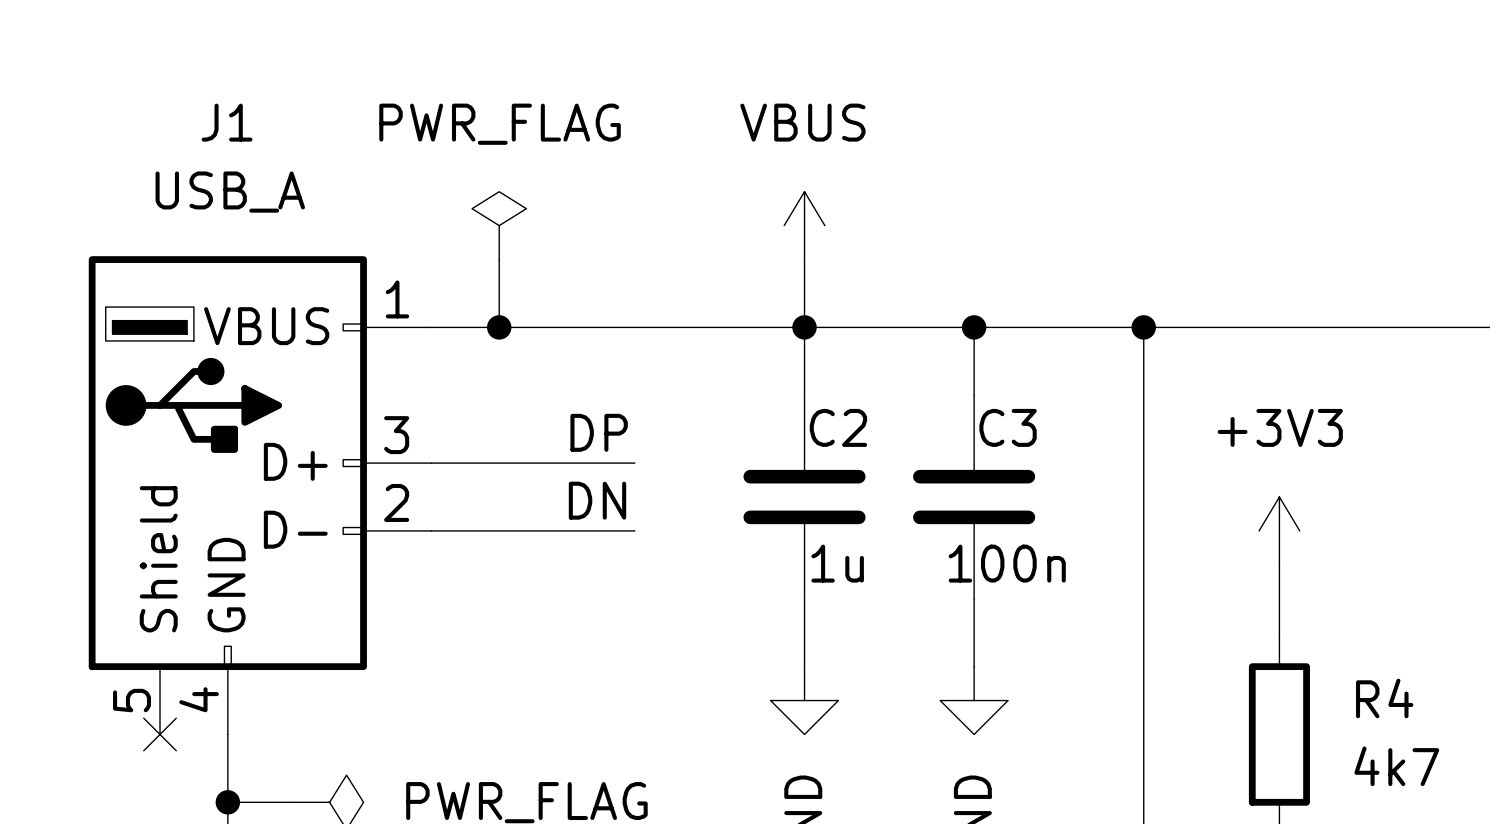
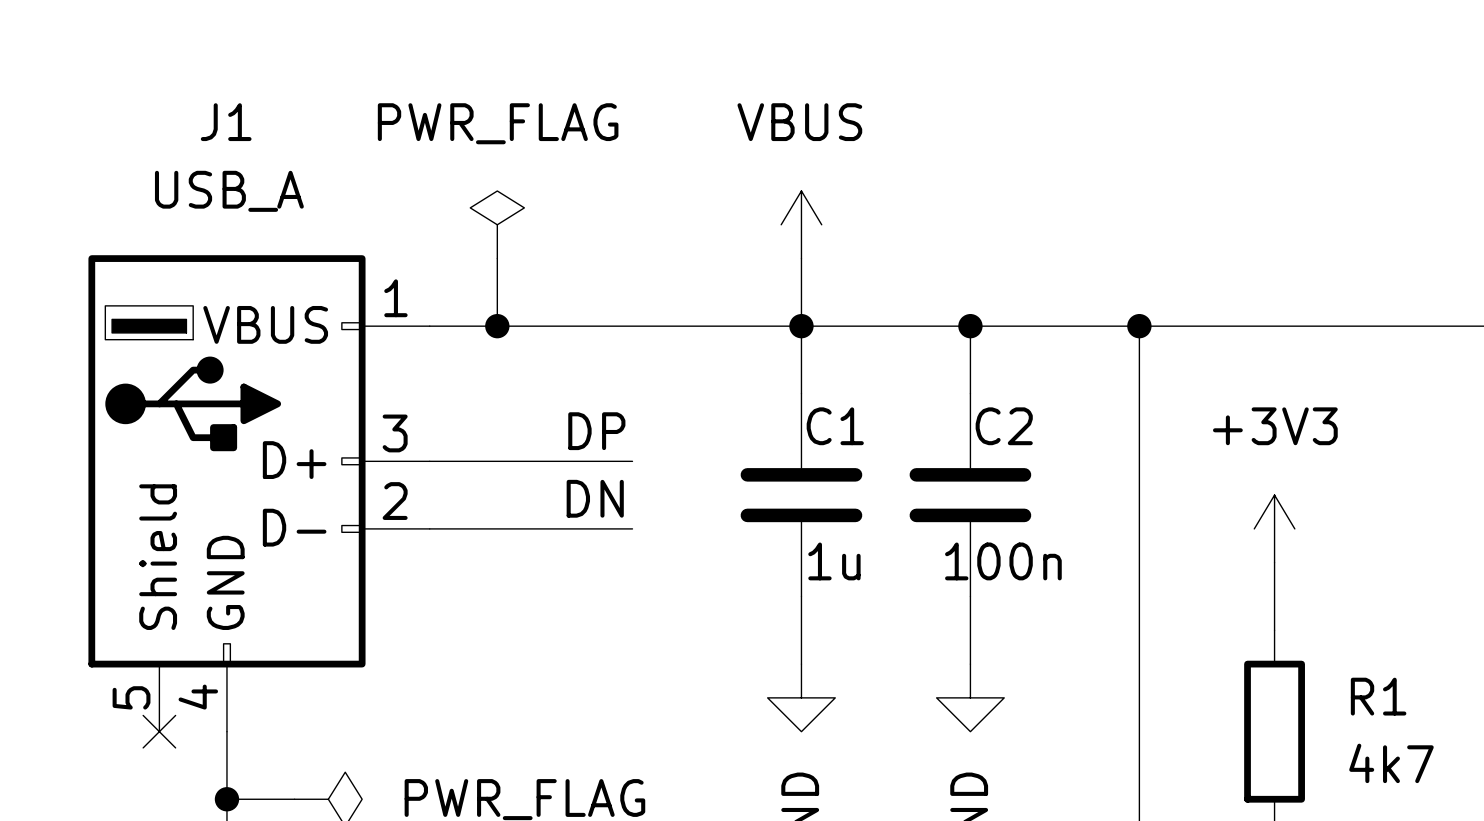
C2 name: C2 (838, 427) -> C1 (835, 426)
C3 name: C3 (1008, 427) -> C2 (1004, 426)
R4 name: R4 (1384, 698) -> R1 (1378, 696)

